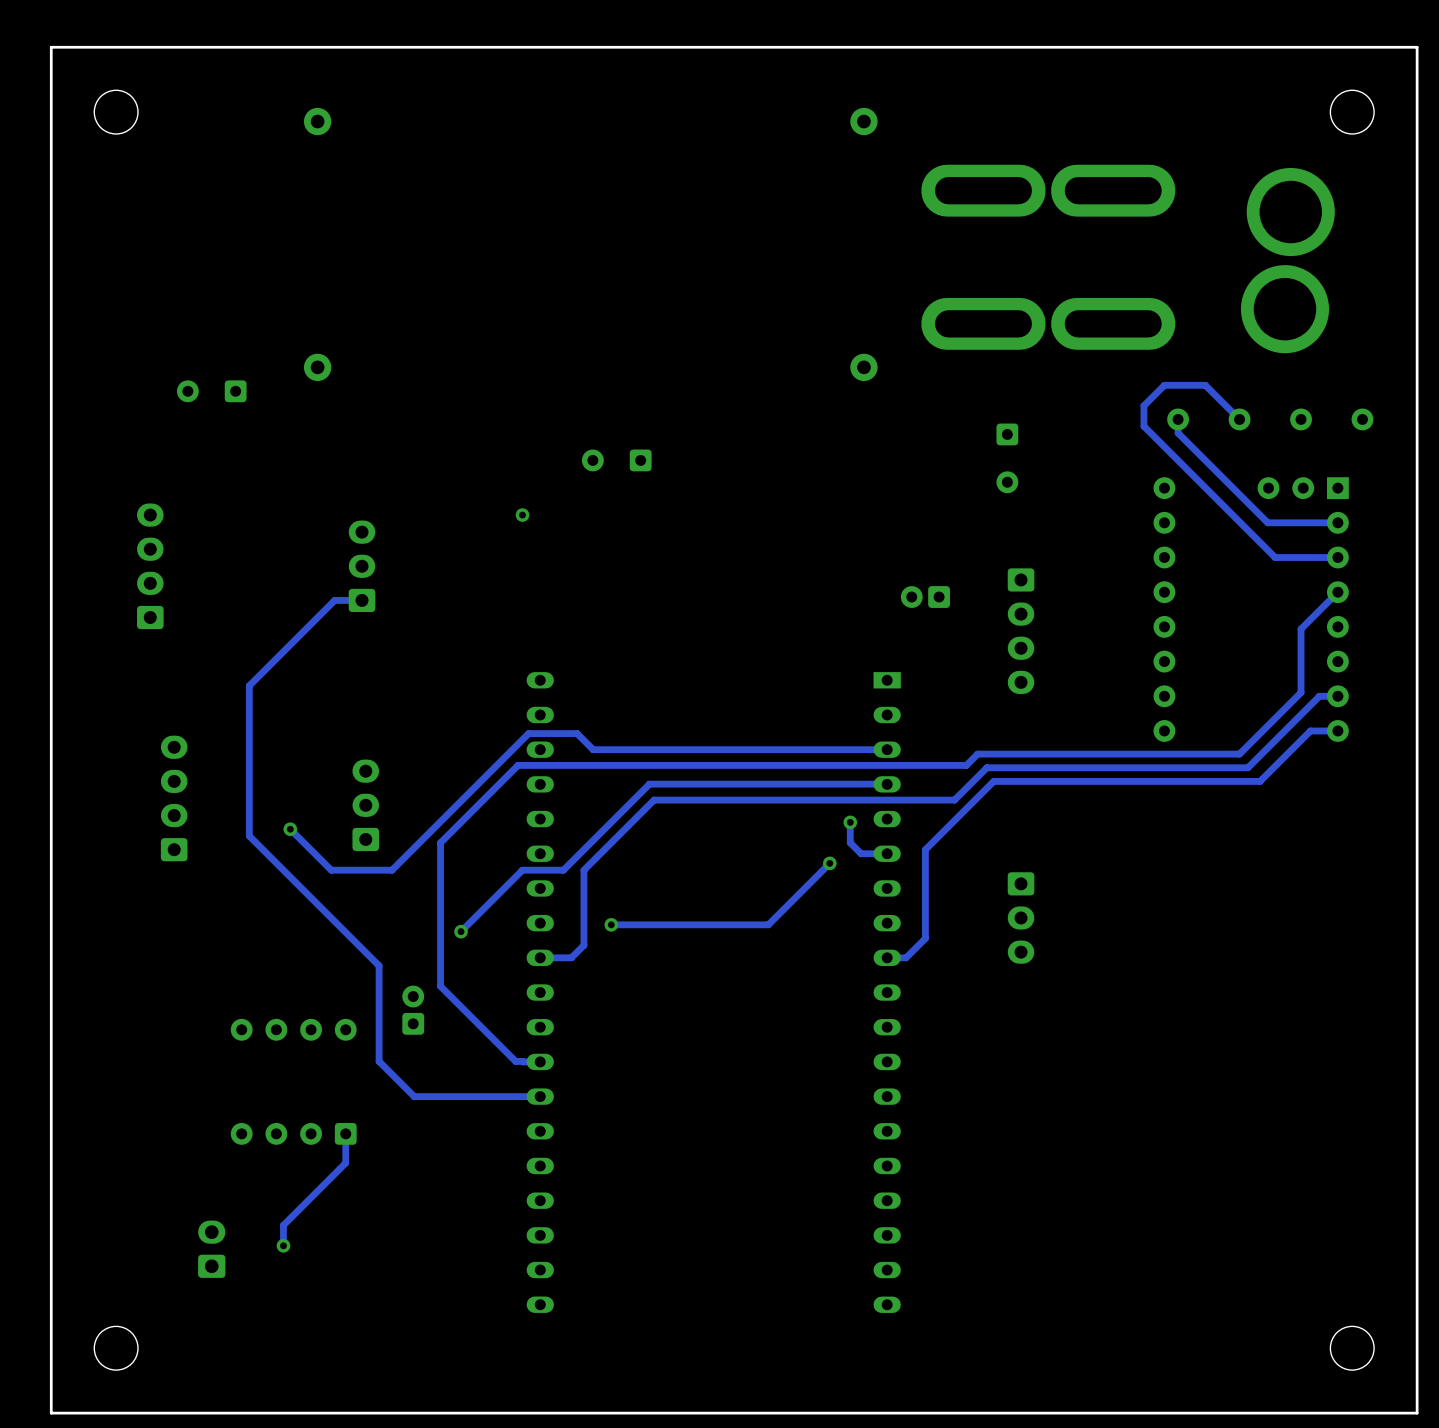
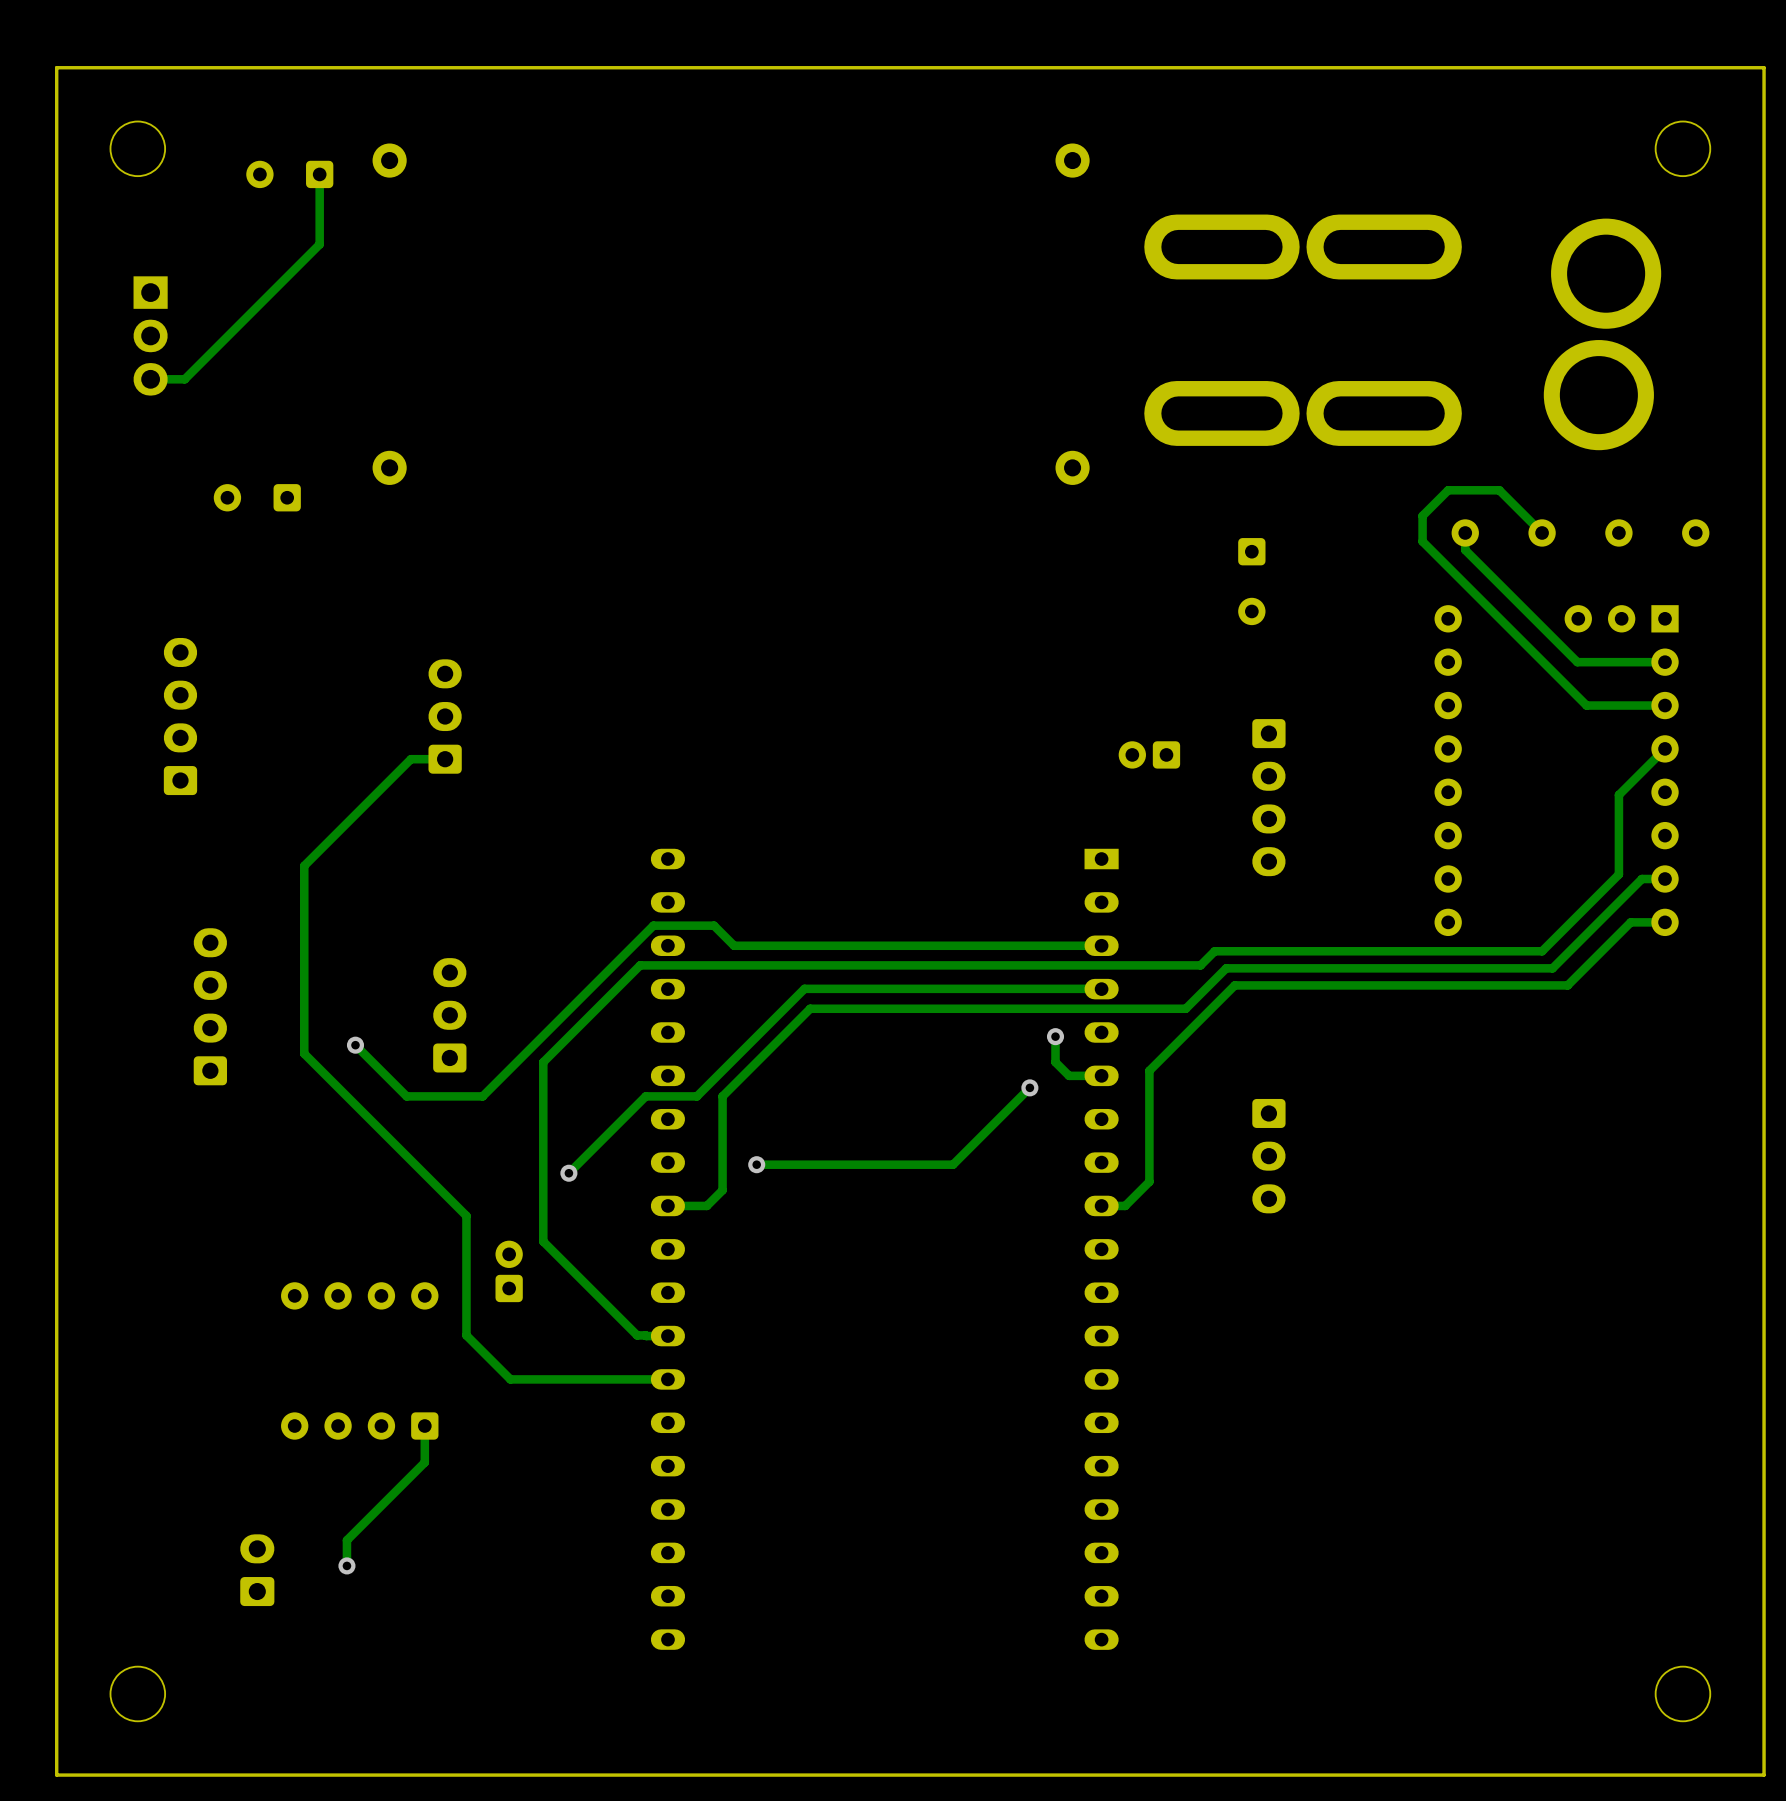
part: none -> (289, 174)
track: none -> (319, 174) (319, 244) (184, 379) (150, 379)
part: none -> (150, 335)
part: (616, 460) -> none
via: (522, 515) -> none

